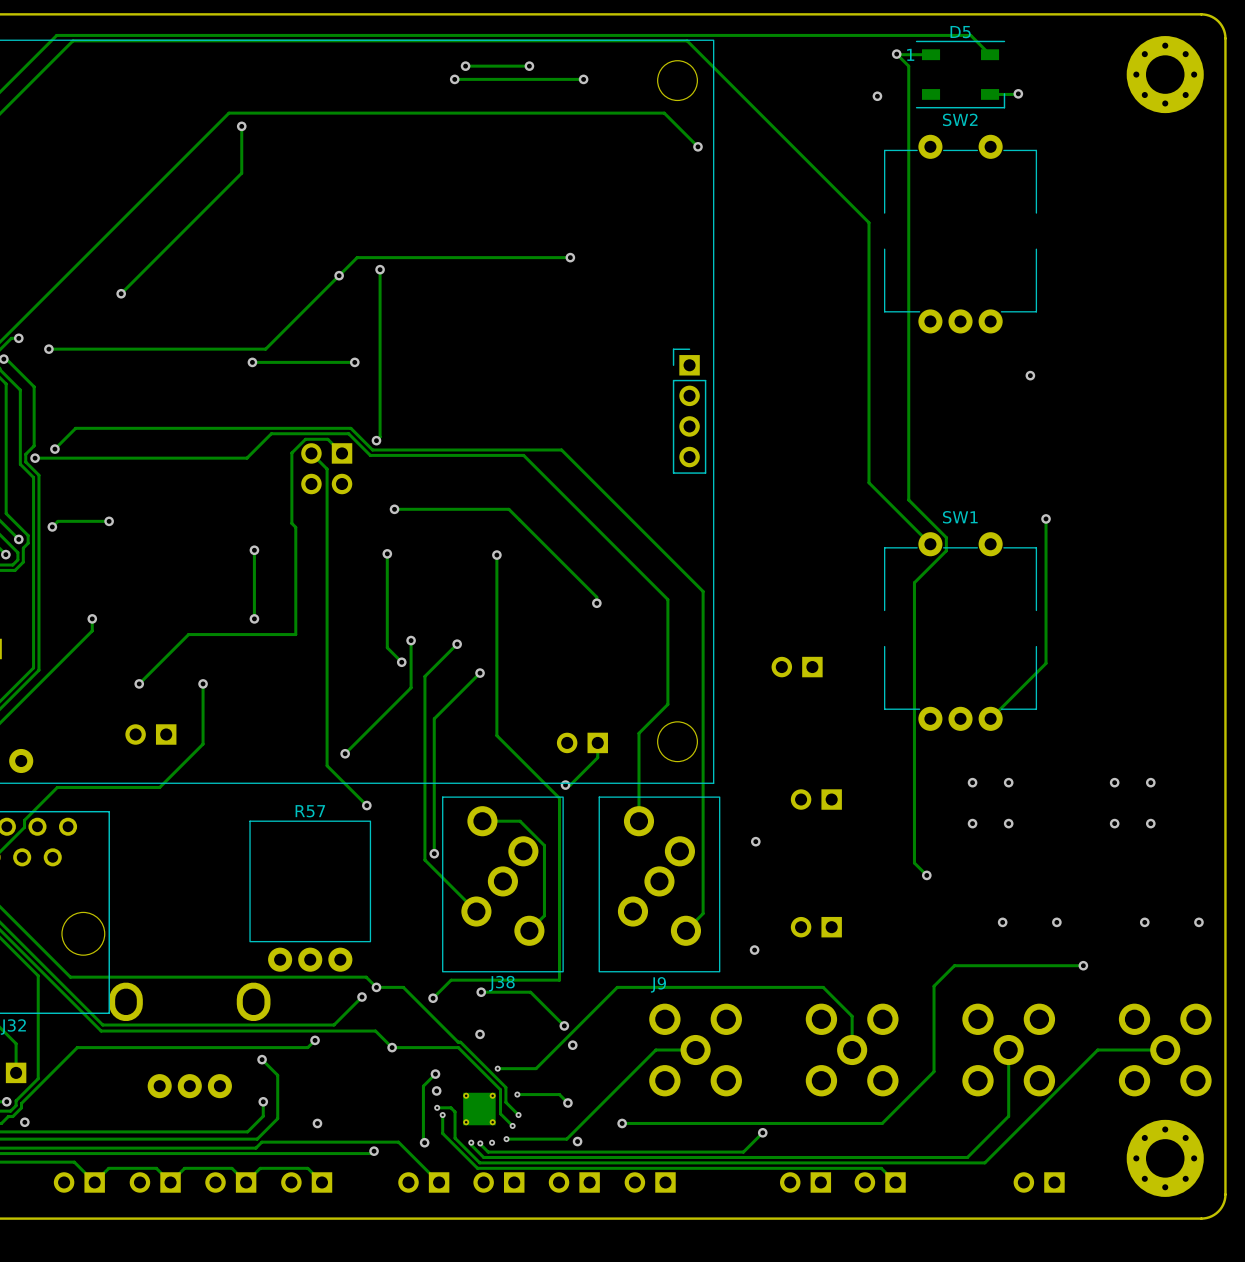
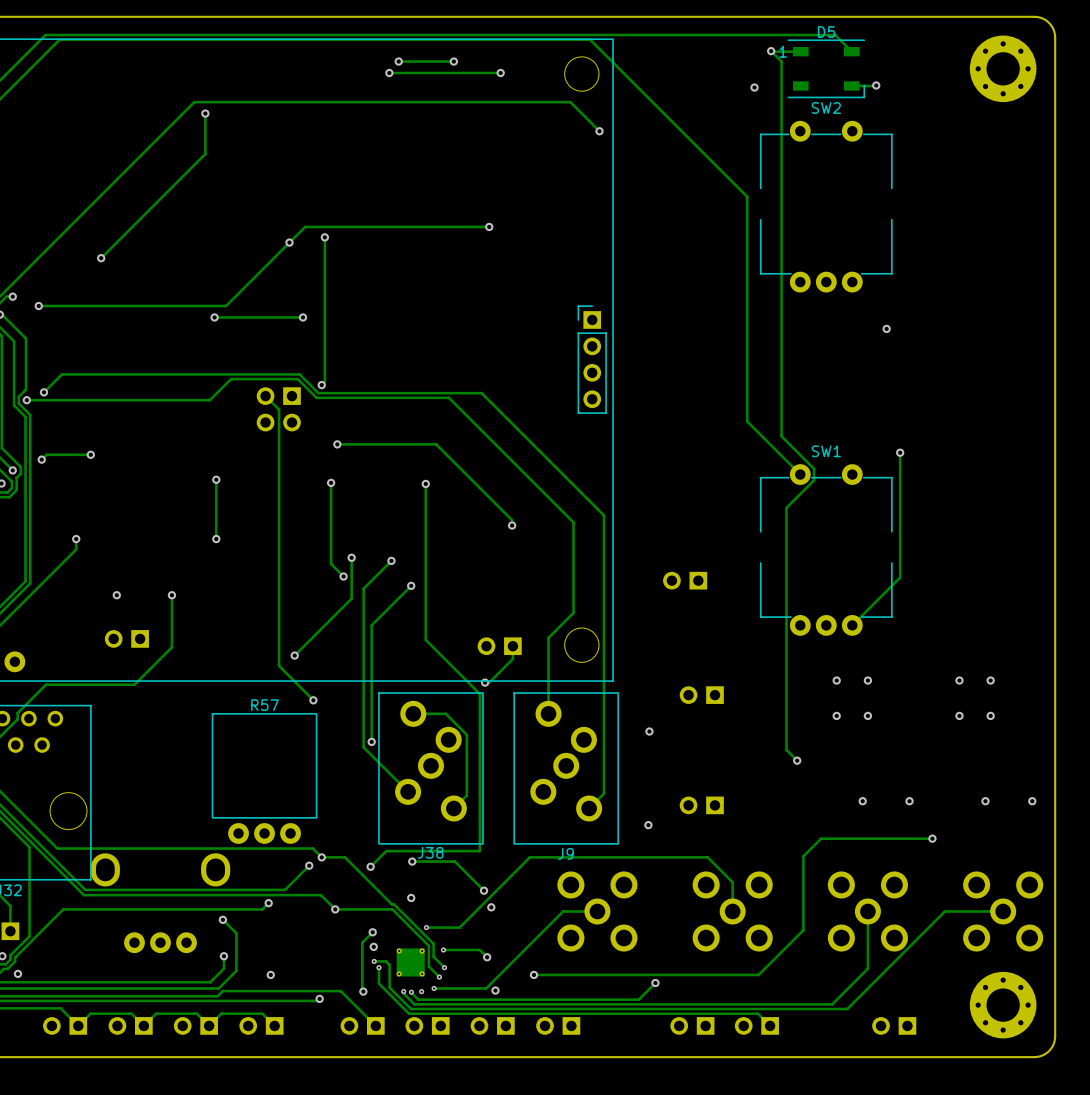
track: (342, 453) (327, 439) (305, 439) (291, 452) (291, 523) (295, 527) (295, 634) (188, 634) (139, 683) -> none

